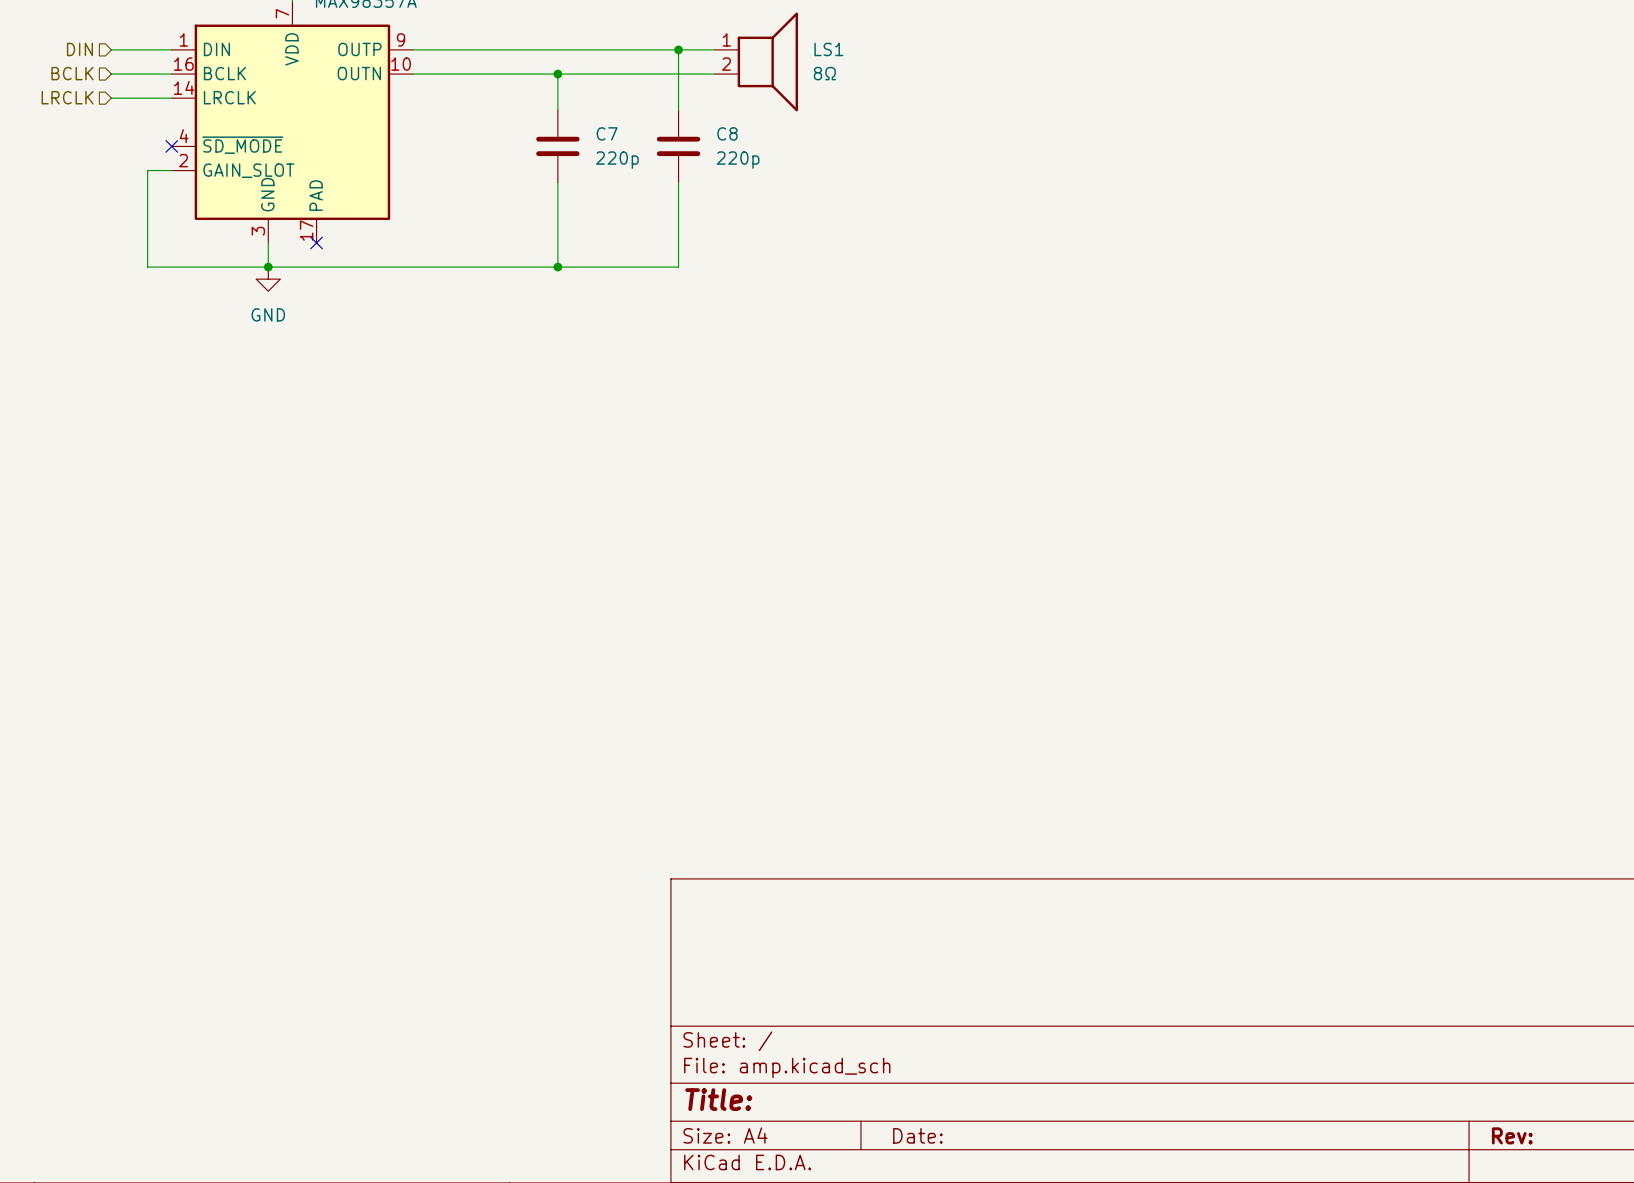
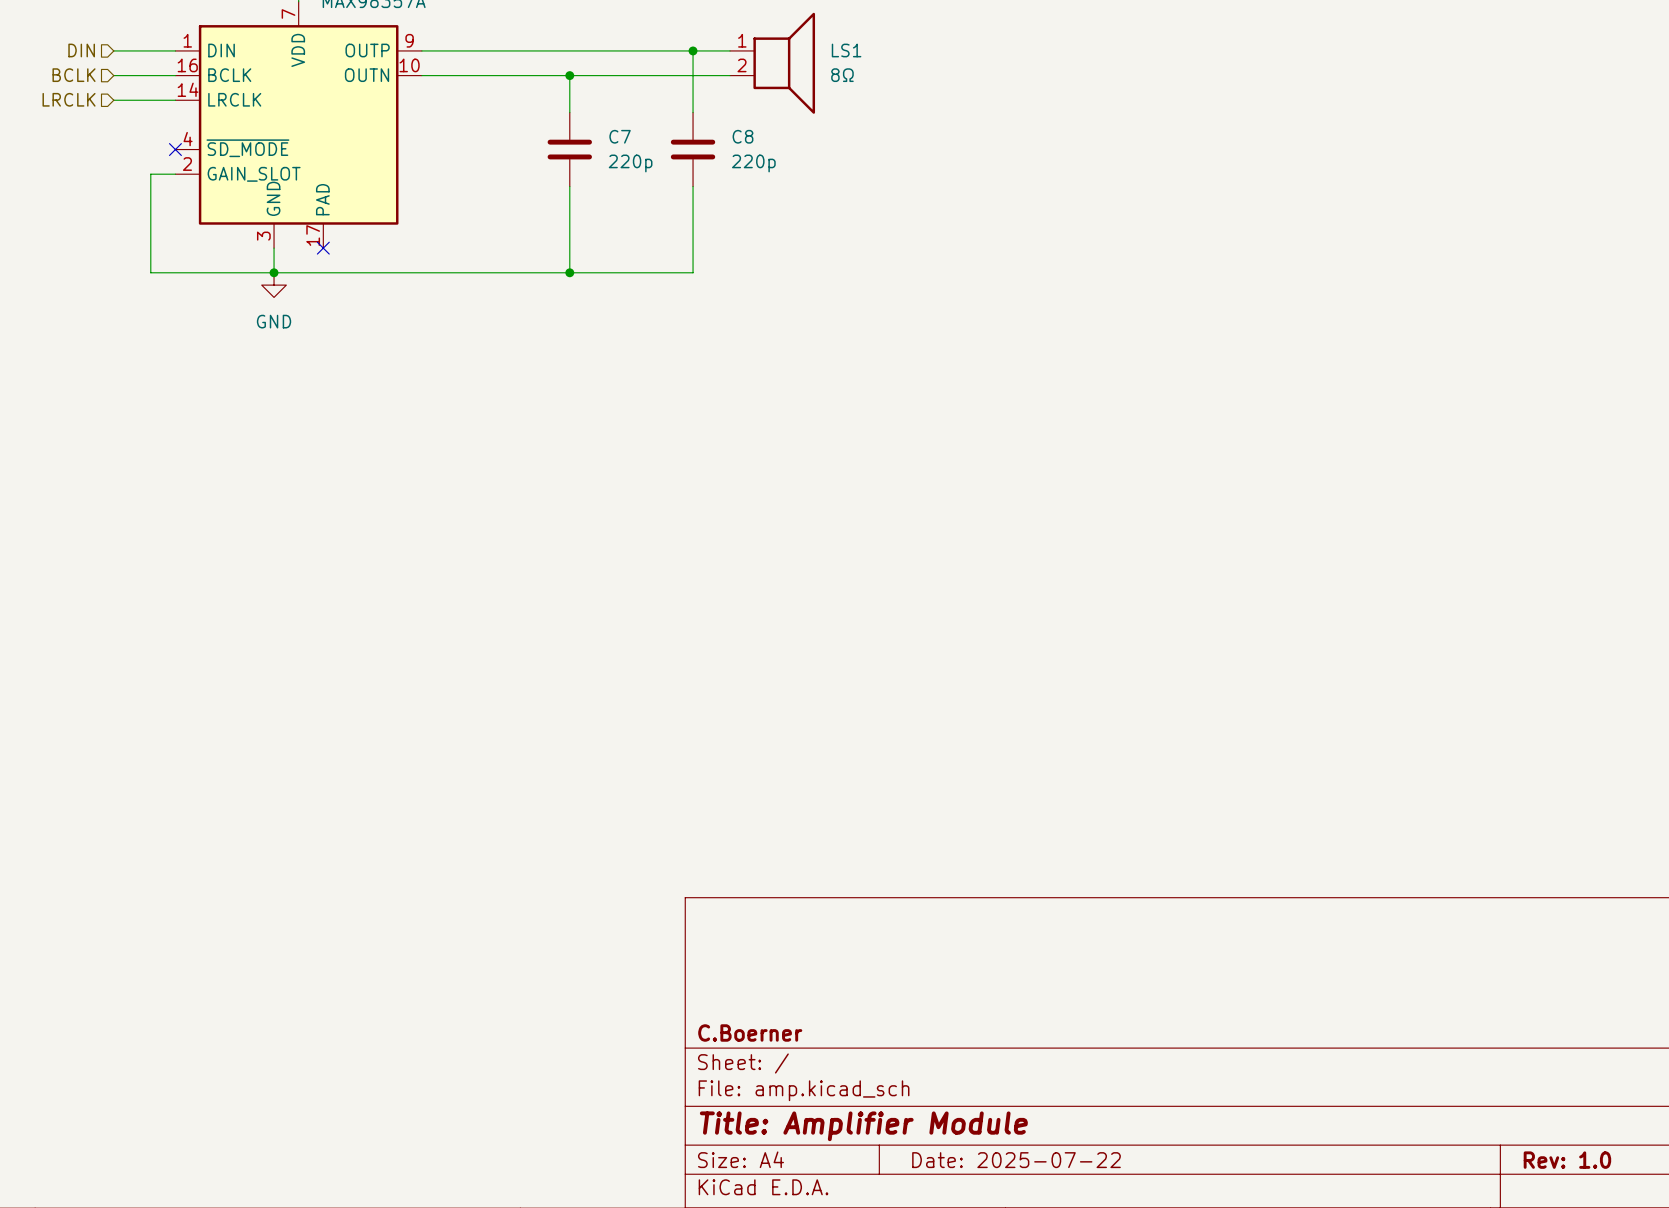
title block: none -> C.Boerner (750, 1033)
title block: Title: (718, 1099) -> Title: Amplifier Module (863, 1126)
title block: Date: (917, 1135) -> Date: 2025-07-22 (1016, 1160)
title block: Rev: (1512, 1135) -> Rev: 1.0 (1567, 1160)

